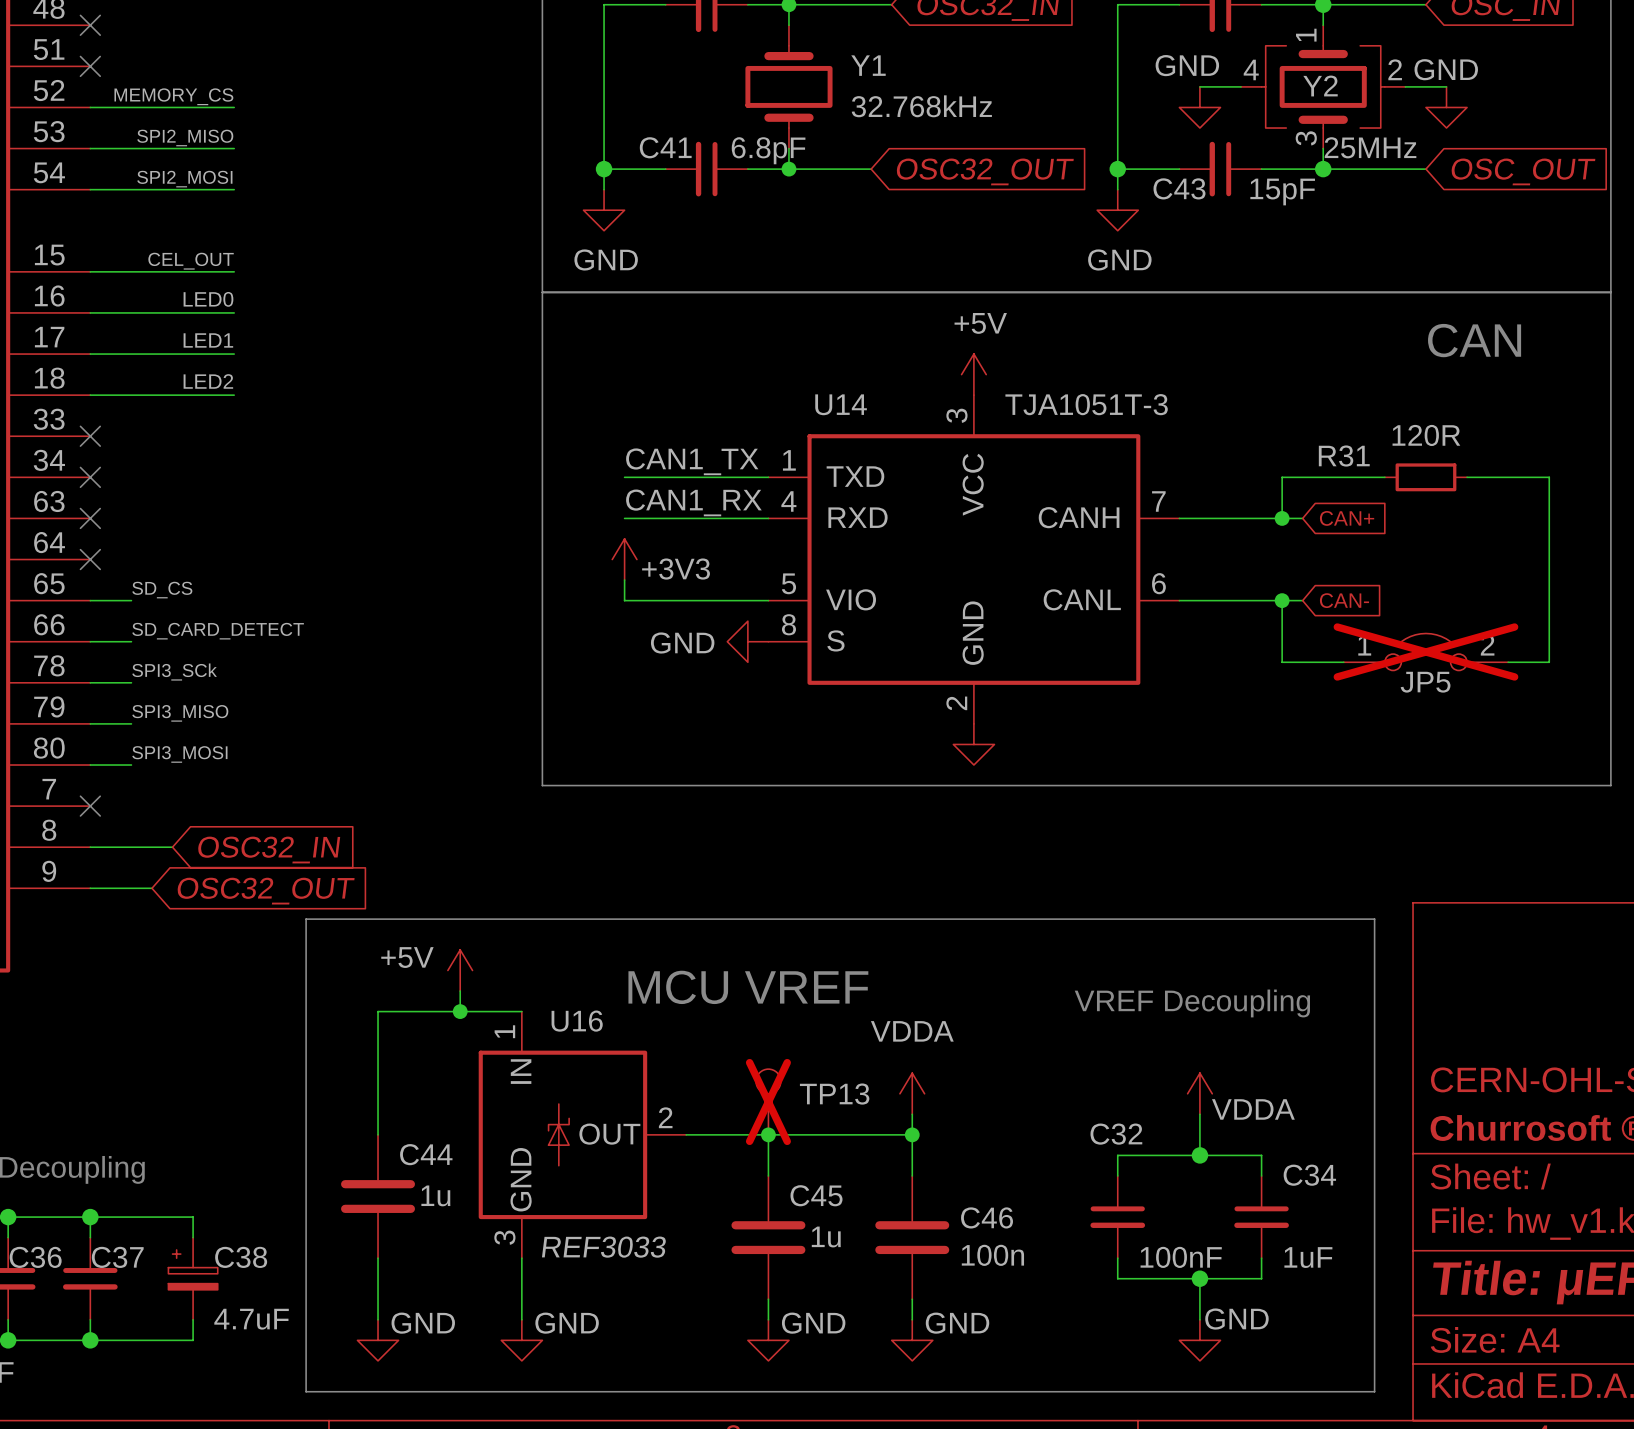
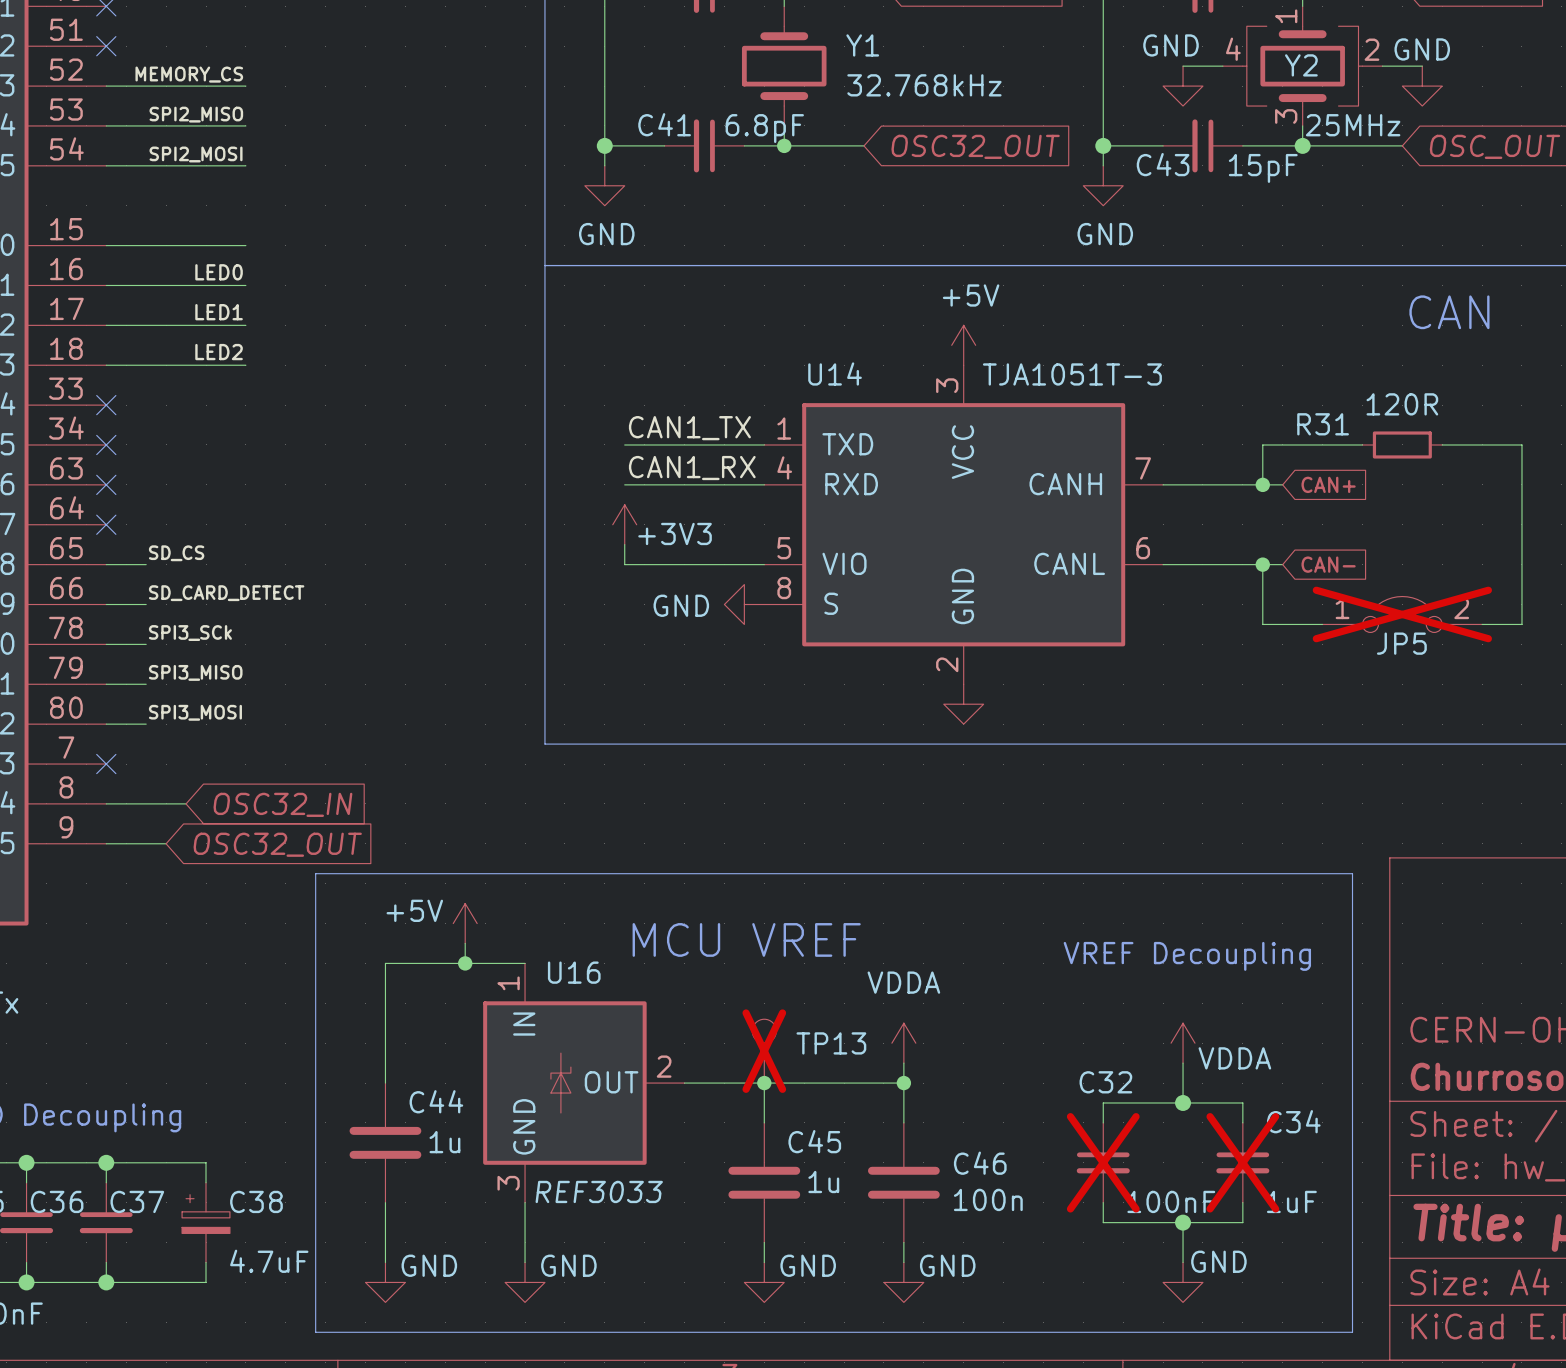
label: CEL_OUT (191, 261) -> none
C32 do-not-place cross: none -> (1103, 1162)
C34 do-not-place cross: none -> (1242, 1162)

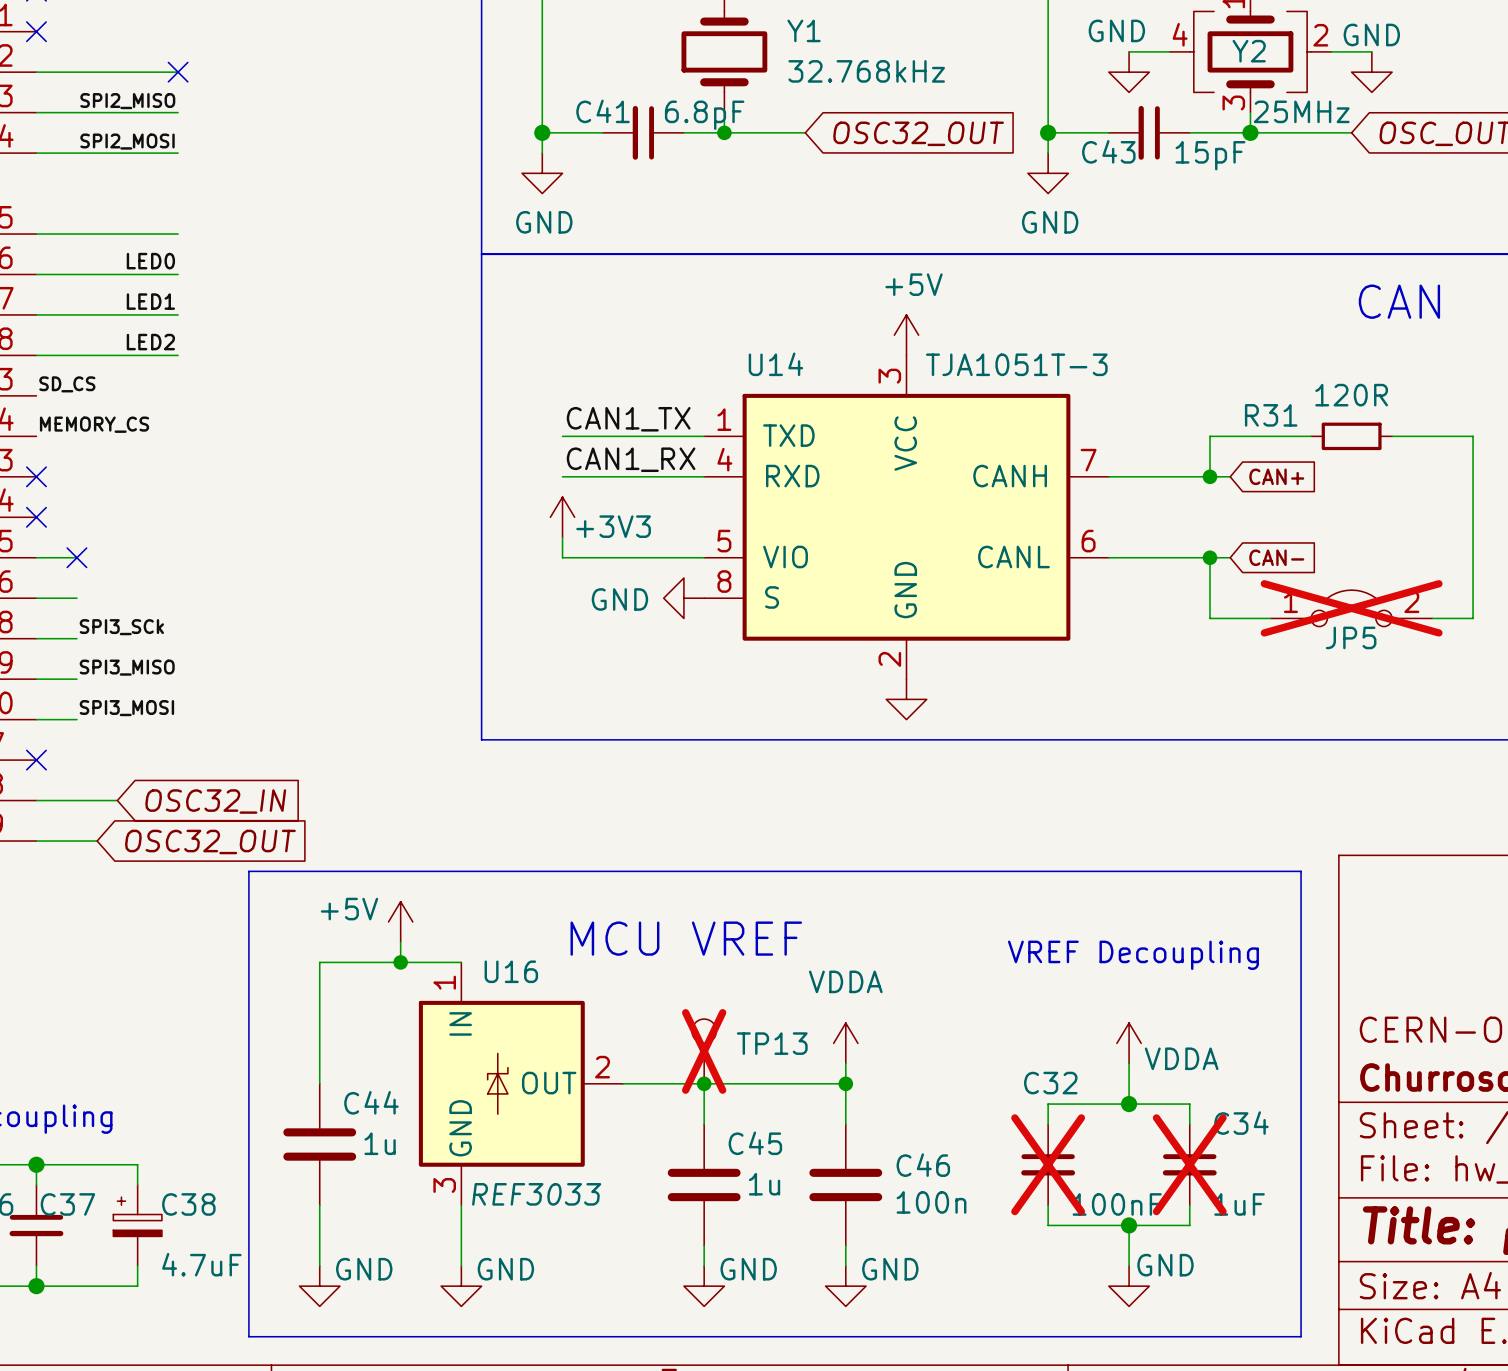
label position: MEMORY_CS (189, 74) -> MEMORY_CS (94, 424)
no-connect mark: none -> (178, 72)
no-connect mark: (106, 405) -> none
no-connect mark: (106, 444) -> none
label position: SD_CS (176, 553) -> SD_CS (67, 384)
no-connect mark: none -> (76, 557)
label: SD_CARD_DETECT (226, 593) -> none

